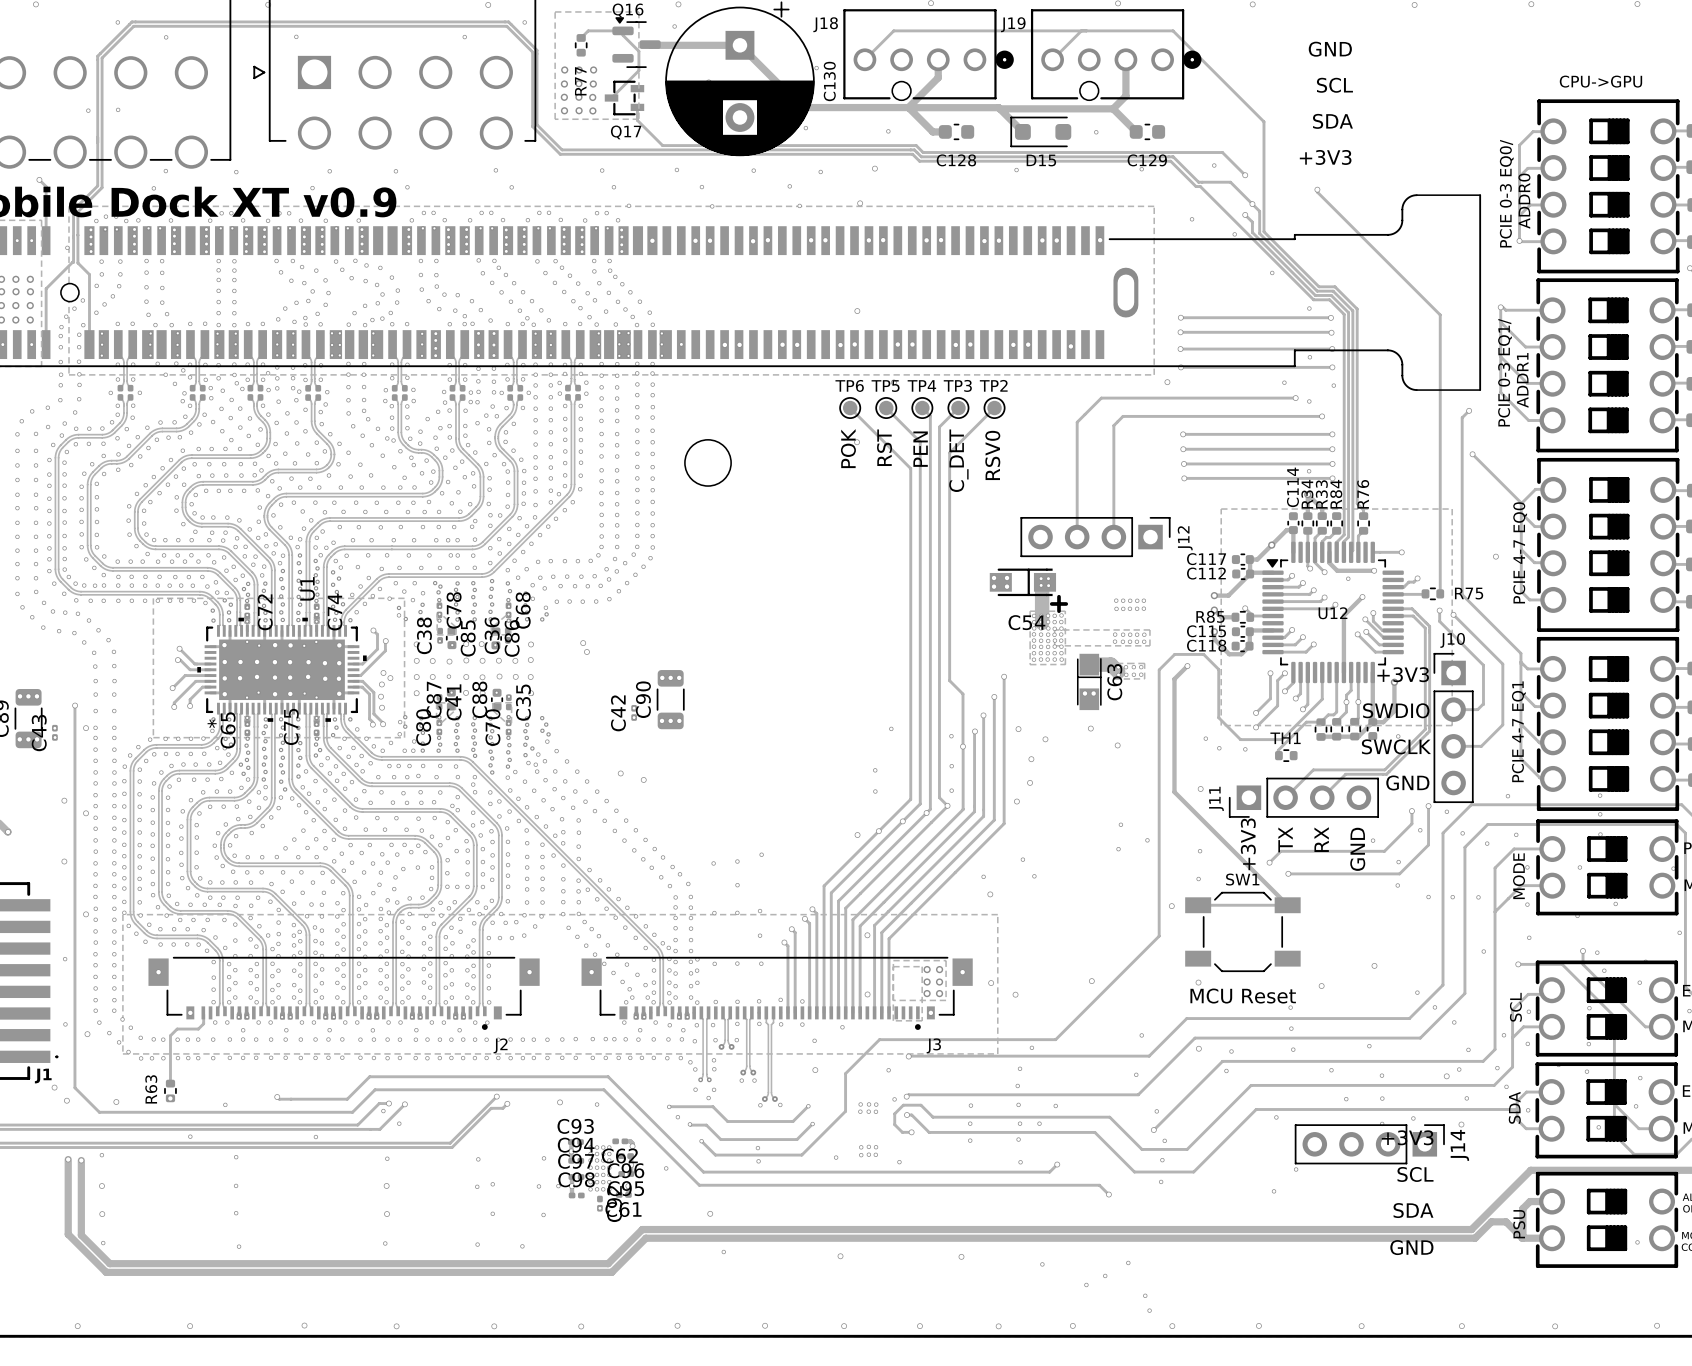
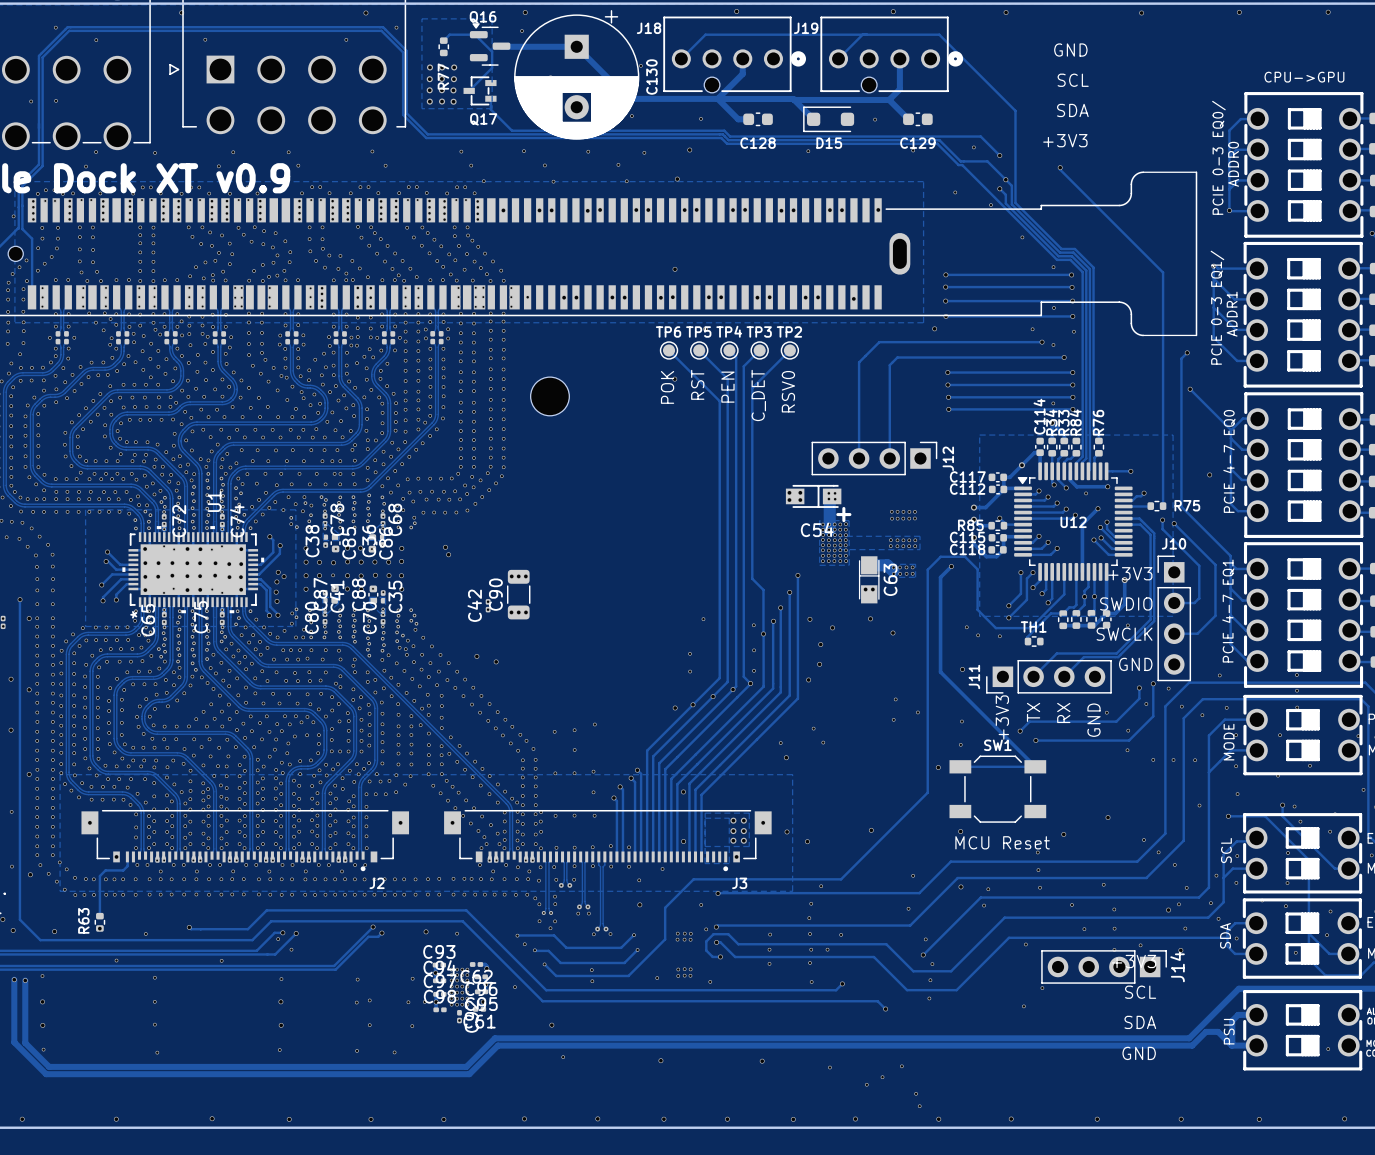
via: none -> (305, 503)

